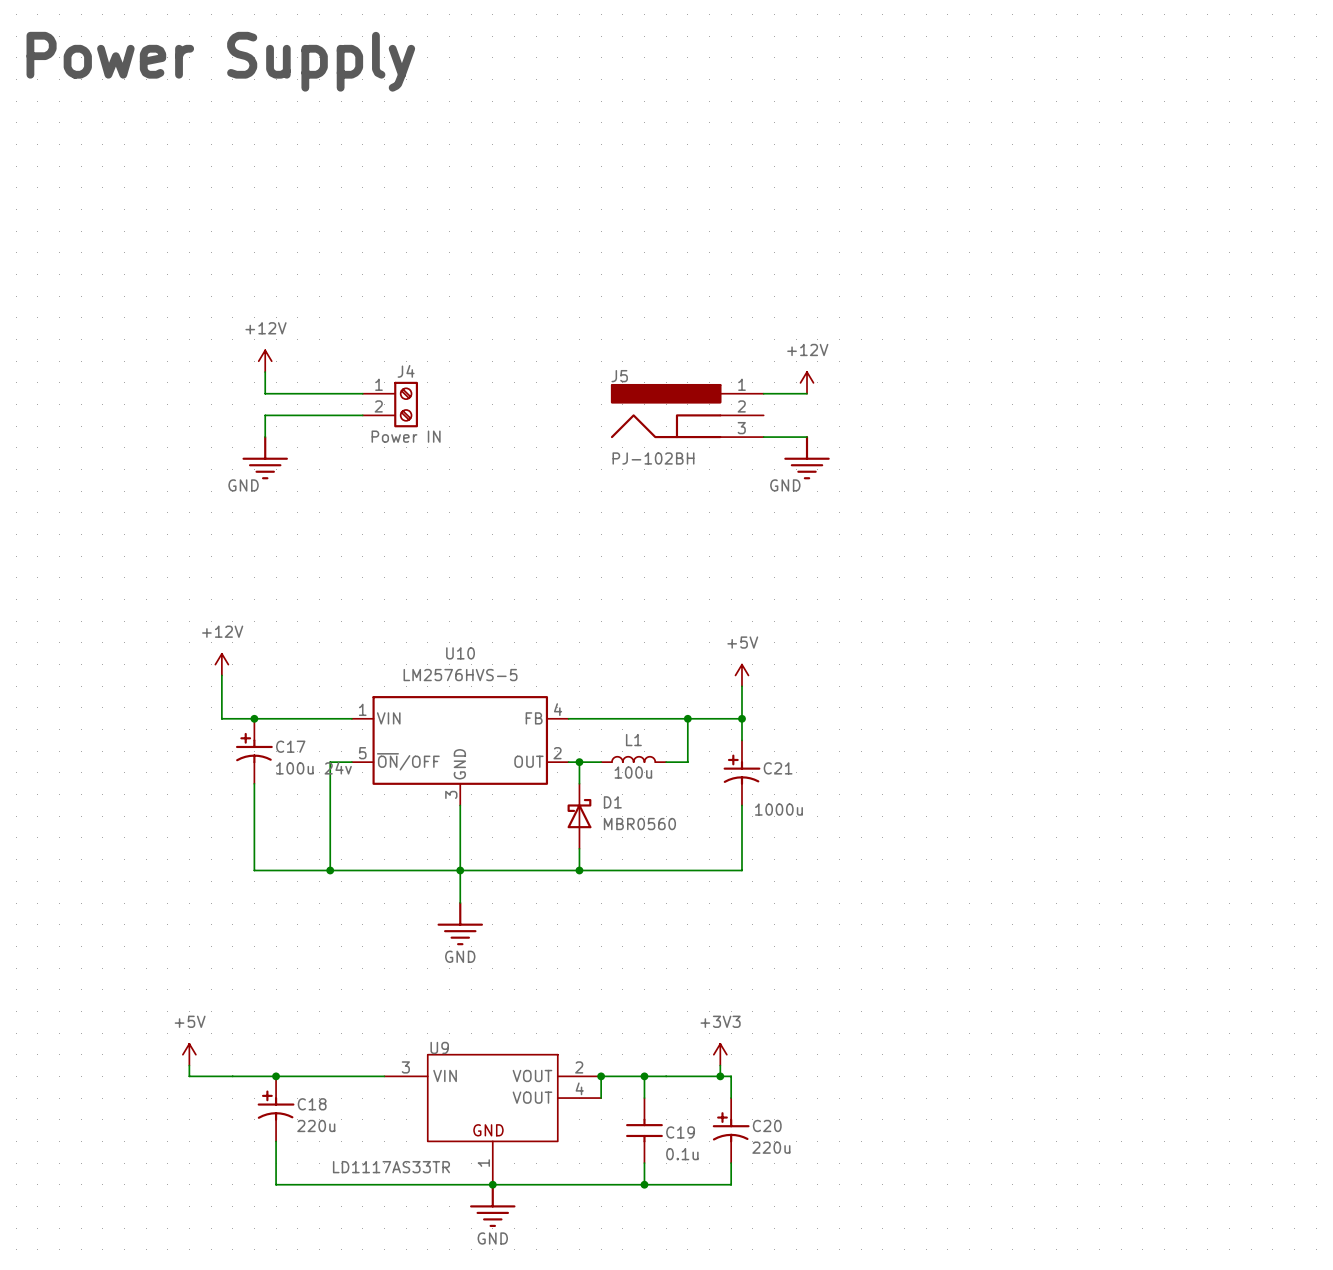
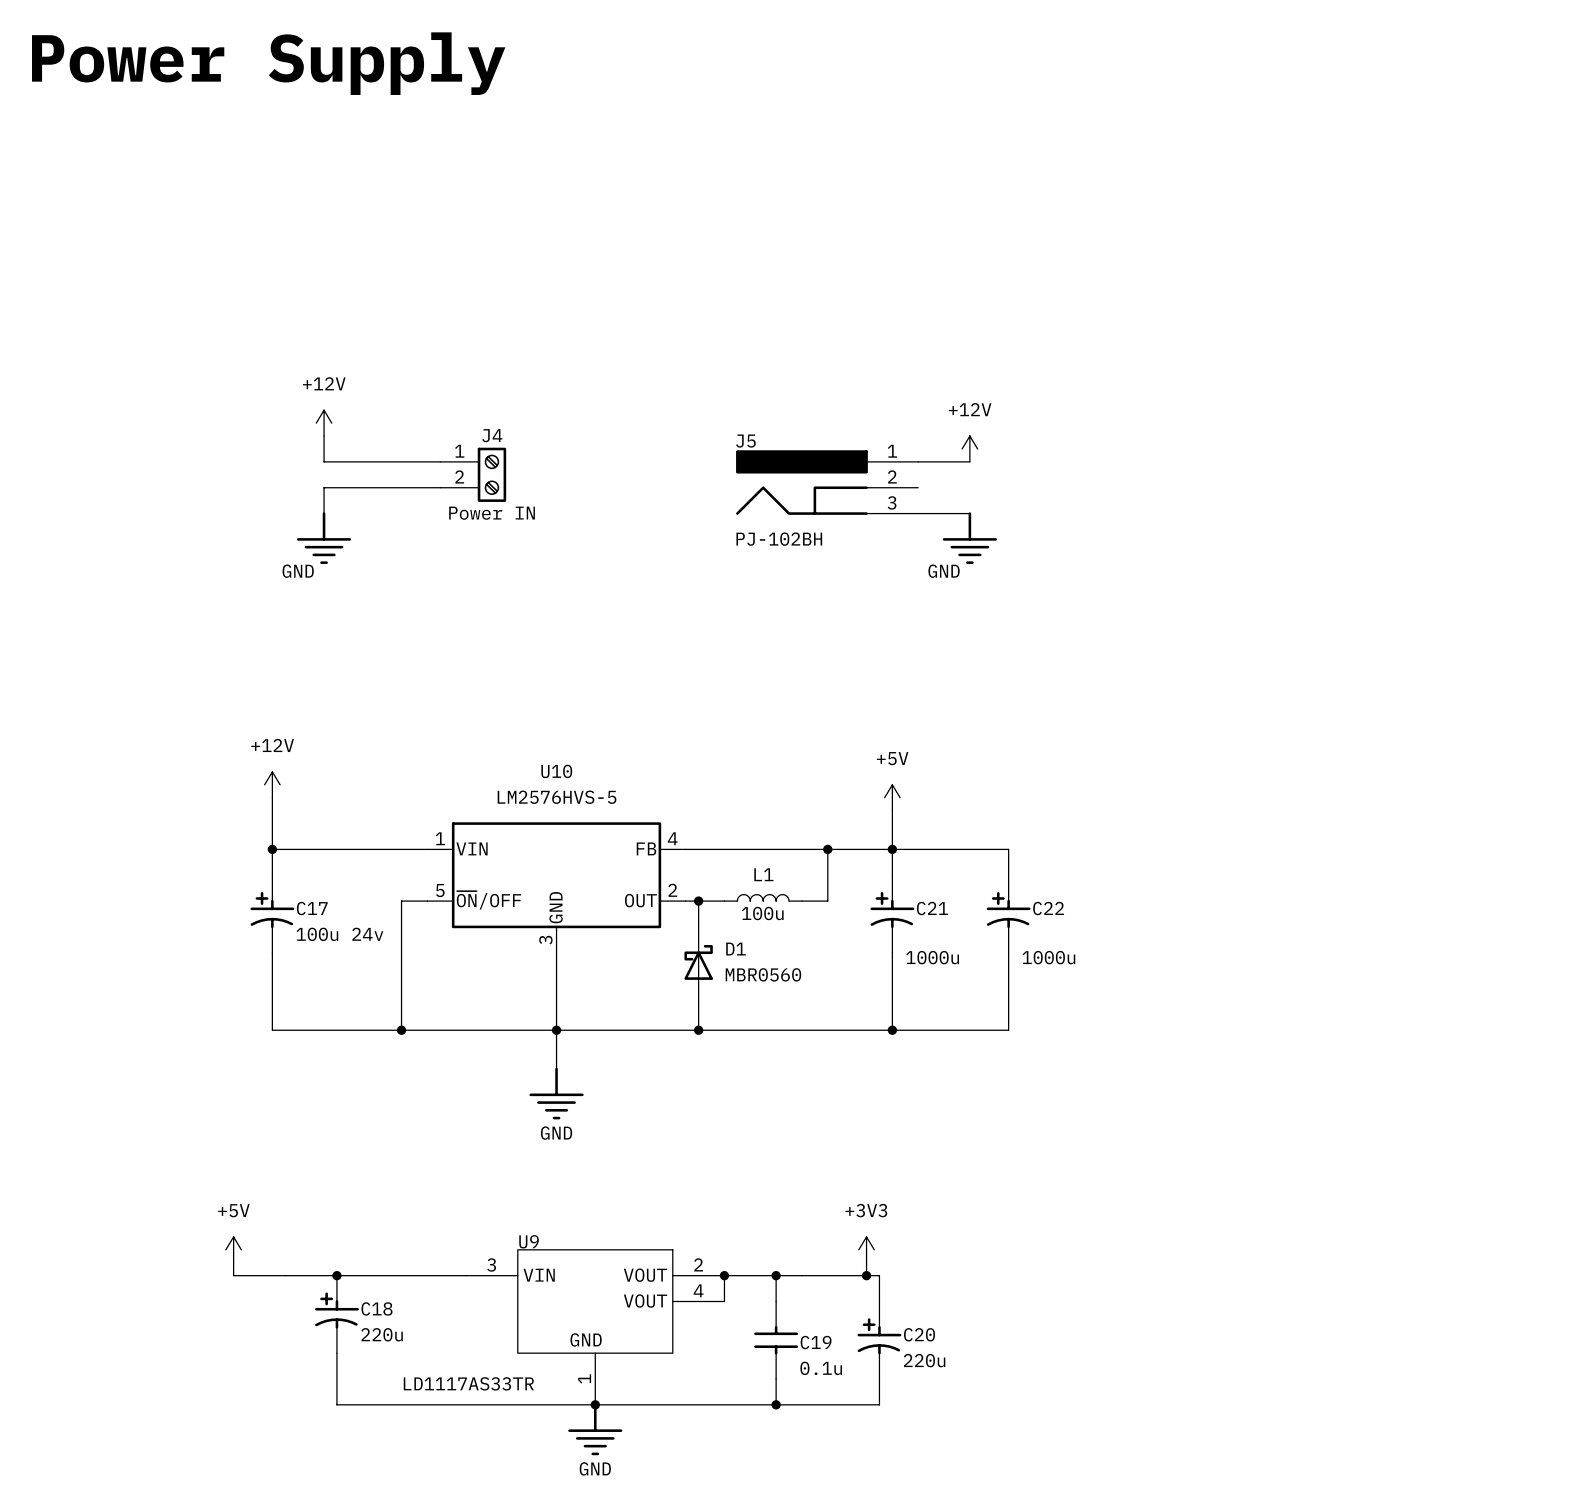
wire: none -> (272, 849) (272, 875)
junction position: (254, 718) -> (272, 849)
wire: none -> (892, 849) (1008, 849) (1008, 875)
C17 position: (254, 751) -> (272, 913)
C22: none -> 1000u (1008, 913)
wire: (254, 783) (254, 870) -> (272, 952) (272, 1030) (311, 1030)
wire: none -> (1008, 952) (1008, 1030) (892, 1030)
junction: none -> (892, 1030)

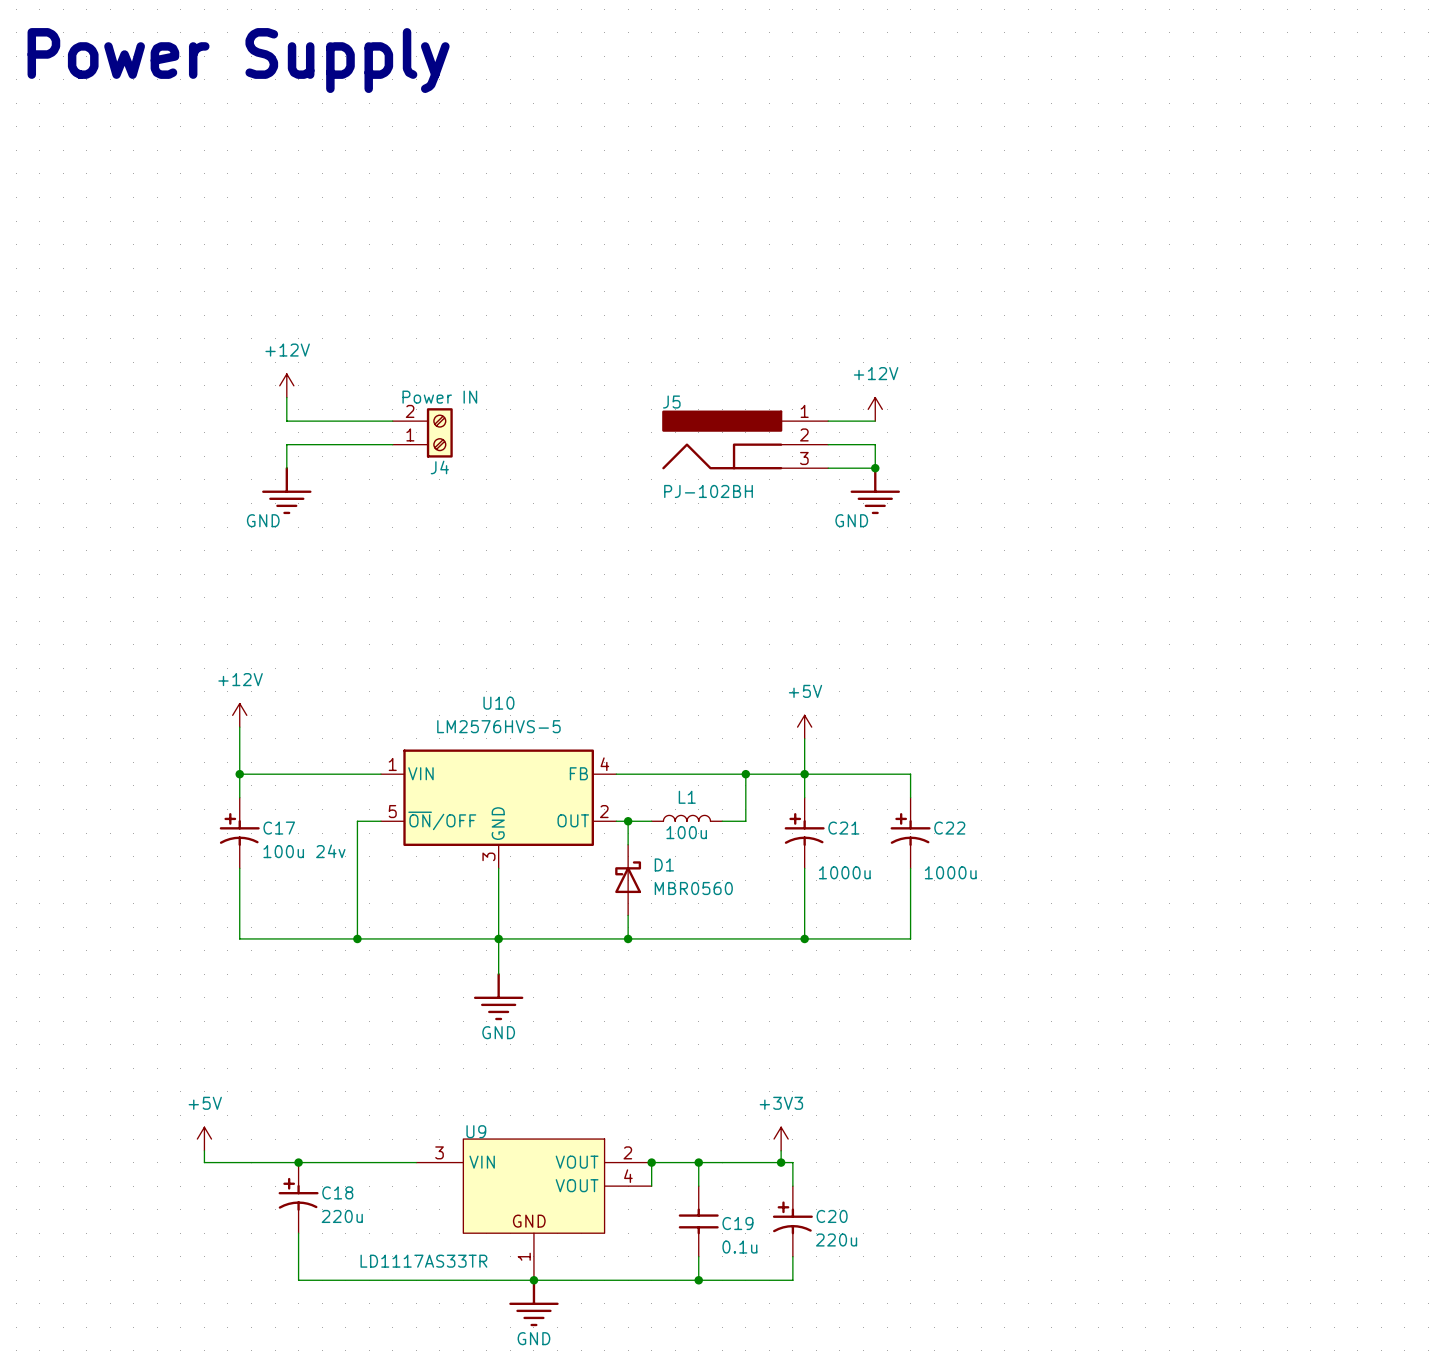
J4 flip: as is (491, 474) -> up-down (439, 432)
wire: none -> (828, 444) (875, 444) (875, 468)
junction: none -> (875, 468)

